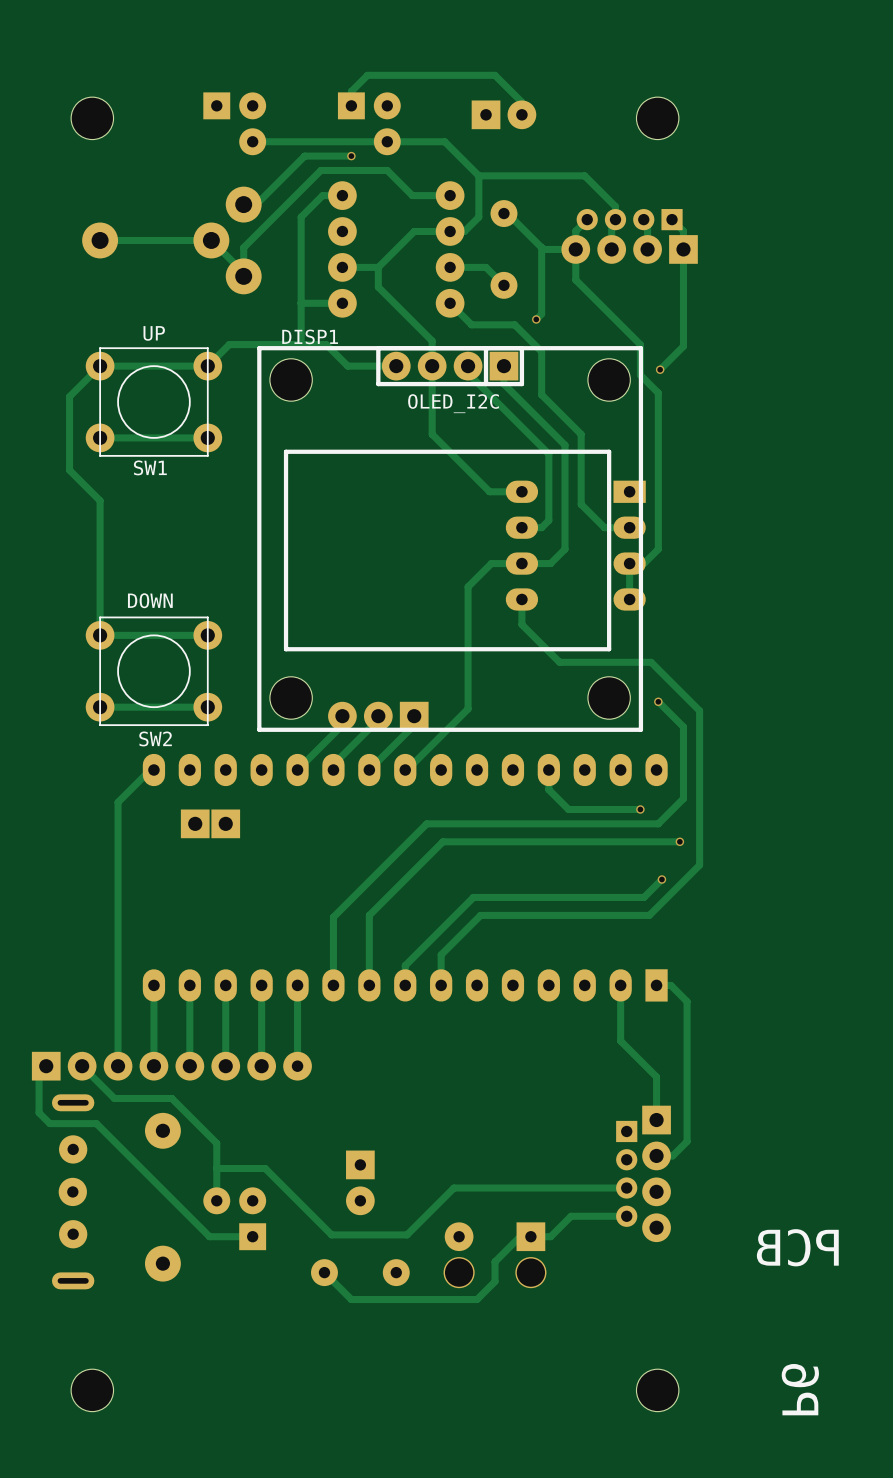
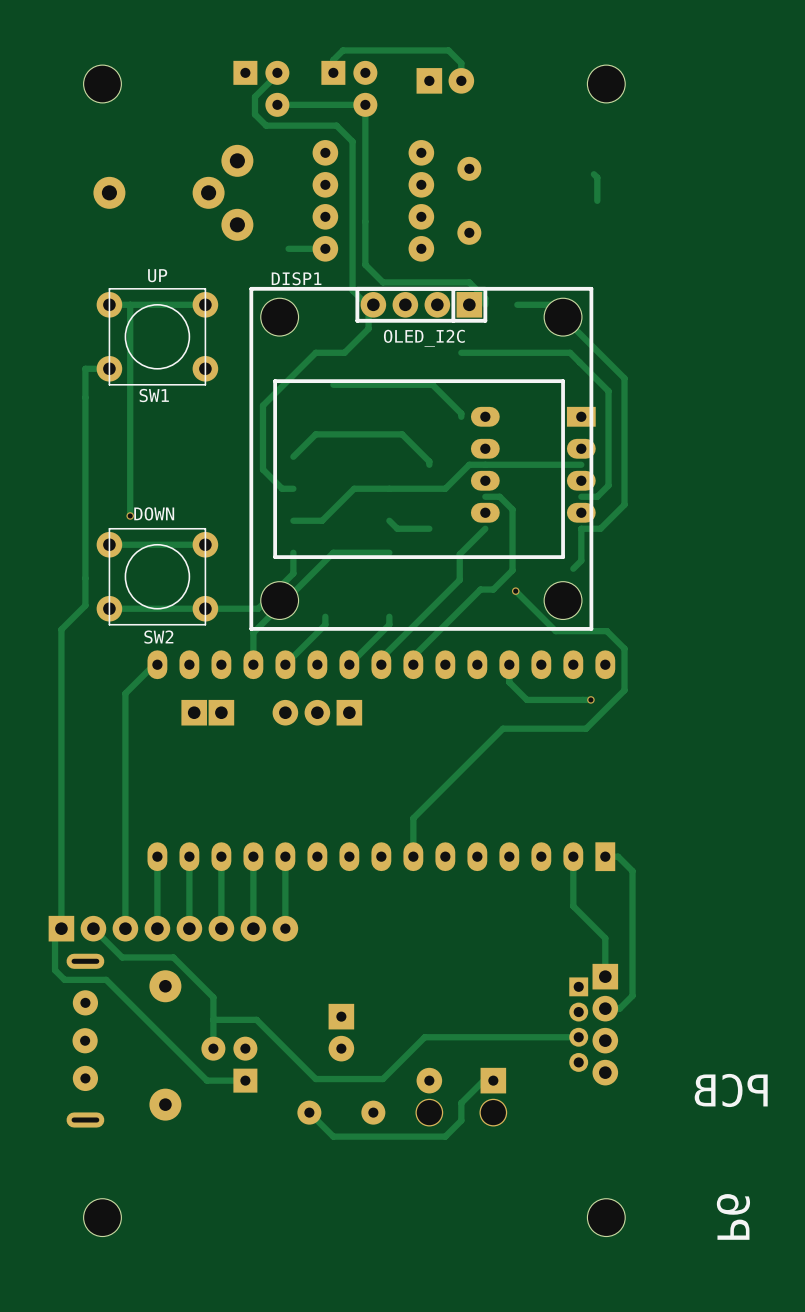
track: (362, 80) (367, 75) (495, 75) (521, 102) (521, 114) -> (342, 50) (448, 50) (461, 63) (461, 80)
track: none -> (277, 72) (254, 96) (254, 114) (266, 125) (336, 125) (352, 141) (352, 290) (368, 306) (368, 328) (344, 352) (315, 352) (262, 405) (262, 469) (282, 488) (293, 488)
part position: (503, 114) -> (445, 80)
part position: (234, 123) -> (261, 88)
track: (288, 141) (252, 141) -> none
track: (387, 141) (444, 141) (478, 175) -> (365, 104) (365, 264) (382, 282) (469, 282) (485, 298) (485, 304)
track: (351, 156) (304, 156) (256, 204) (243, 204) -> none
via: (351, 156) -> none
track: (478, 175) (584, 175) (615, 206) (615, 219) (611, 223) (611, 249) -> none
track: (478, 175) (478, 217) (464, 231) (414, 231) (378, 267) -> none
track: (342, 195) (322, 195) (301, 217) (301, 344) -> none
track: (450, 195) (412, 195) (387, 170) (320, 170) (243, 247) (243, 276) -> none
track: (503, 213) (507, 213) (543, 249) (575, 249) -> none
track: (587, 219) (575, 231) (575, 279) (640, 344) (640, 375) (658, 393) (658, 549) (643, 563) (629, 563) (629, 599) -> none
track: (672, 219) (683, 231) (683, 346) (660, 369) -> none
part: (629, 236) -> none
track: (100, 240) (211, 240) (243, 272) -> none
track: (541, 247) (541, 314) (536, 319) -> none
track: (378, 267) (342, 267) -> none
track: (378, 267) (378, 287) (432, 340) (432, 434) (489, 491) (521, 491) -> none
track: (450, 267) (486, 267) (503, 285) -> none
track: (450, 303) (471, 324) (514, 324) (541, 351) (541, 394) (581, 434) (581, 504) (604, 527) (629, 527) -> none
via: (536, 319) -> none
track: (100, 366) (69, 396) (69, 470) (100, 500) (100, 635) -> none
track: none -> (130, 304) (130, 515)
track: (396, 366) (347, 366) (326, 344) (229, 344) (207, 366) -> none
track: (468, 366) (468, 373) (548, 454) (548, 520) (541, 527) (521, 527) -> none
track: (503, 366) (503, 384) (565, 445) (565, 549) (550, 563) (491, 563) (468, 586) (468, 708) (407, 770) -> none
track: none -> (517, 304) (550, 304) (624, 378) (624, 504) (600, 528) (581, 528) (581, 560) (573, 568)
via: (660, 369) -> none
track: none -> (461, 352) (570, 352) (608, 391) (608, 485) (597, 496) (581, 496)
track: (207, 437) (100, 437) -> (61, 928) (61, 629) (85, 605) (85, 368) (109, 368)
track: none -> (333, 384) (432, 384) (461, 413) (461, 416)
track: none -> (293, 456) (315, 434) (402, 434) (429, 461) (429, 464)
track: none -> (581, 464) (469, 464) (445, 488) (354, 488) (322, 520) (293, 520)
track: none -> (485, 496) (499, 496) (512, 509) (512, 570) (493, 589) (480, 589) (413, 656) (413, 664)
track: (521, 599) (521, 624) (559, 662) (651, 662) (699, 710) (699, 865) (649, 915) (480, 915) (441, 954) -> none
via: none -> (130, 515)
track: none -> (389, 520) (397, 528) (429, 528)
track: none -> (485, 528) (459, 554) (459, 579) (381, 658) (381, 664)
track: none -> (293, 552) (293, 573) (258, 608) (205, 608)
track: none -> (389, 552) (333, 552) (253, 632) (253, 664)
via: none -> (515, 591)
track: (658, 701) (683, 726) (683, 798) (658, 823) (426, 823) (333, 917) (333, 985) -> none
via: (658, 701) -> none
track: (378, 716) (378, 719) (333, 764) -> none
part position: (378, 716) -> (317, 712)
track: (541, 841) (442, 841) (369, 915) (369, 985) -> (502, 728) (413, 818) (413, 829)
track: (679, 841) (635, 841) -> (515, 591) (555, 631) (606, 631) (624, 648) (624, 690) (586, 728)
via: (679, 841) -> none
track: (661, 879) (643, 897) (473, 897) (405, 965) (405, 985) -> none
via: (661, 879) -> none
track: (626, 1216) (571, 1216) (550, 1236) (530, 1236) -> none

